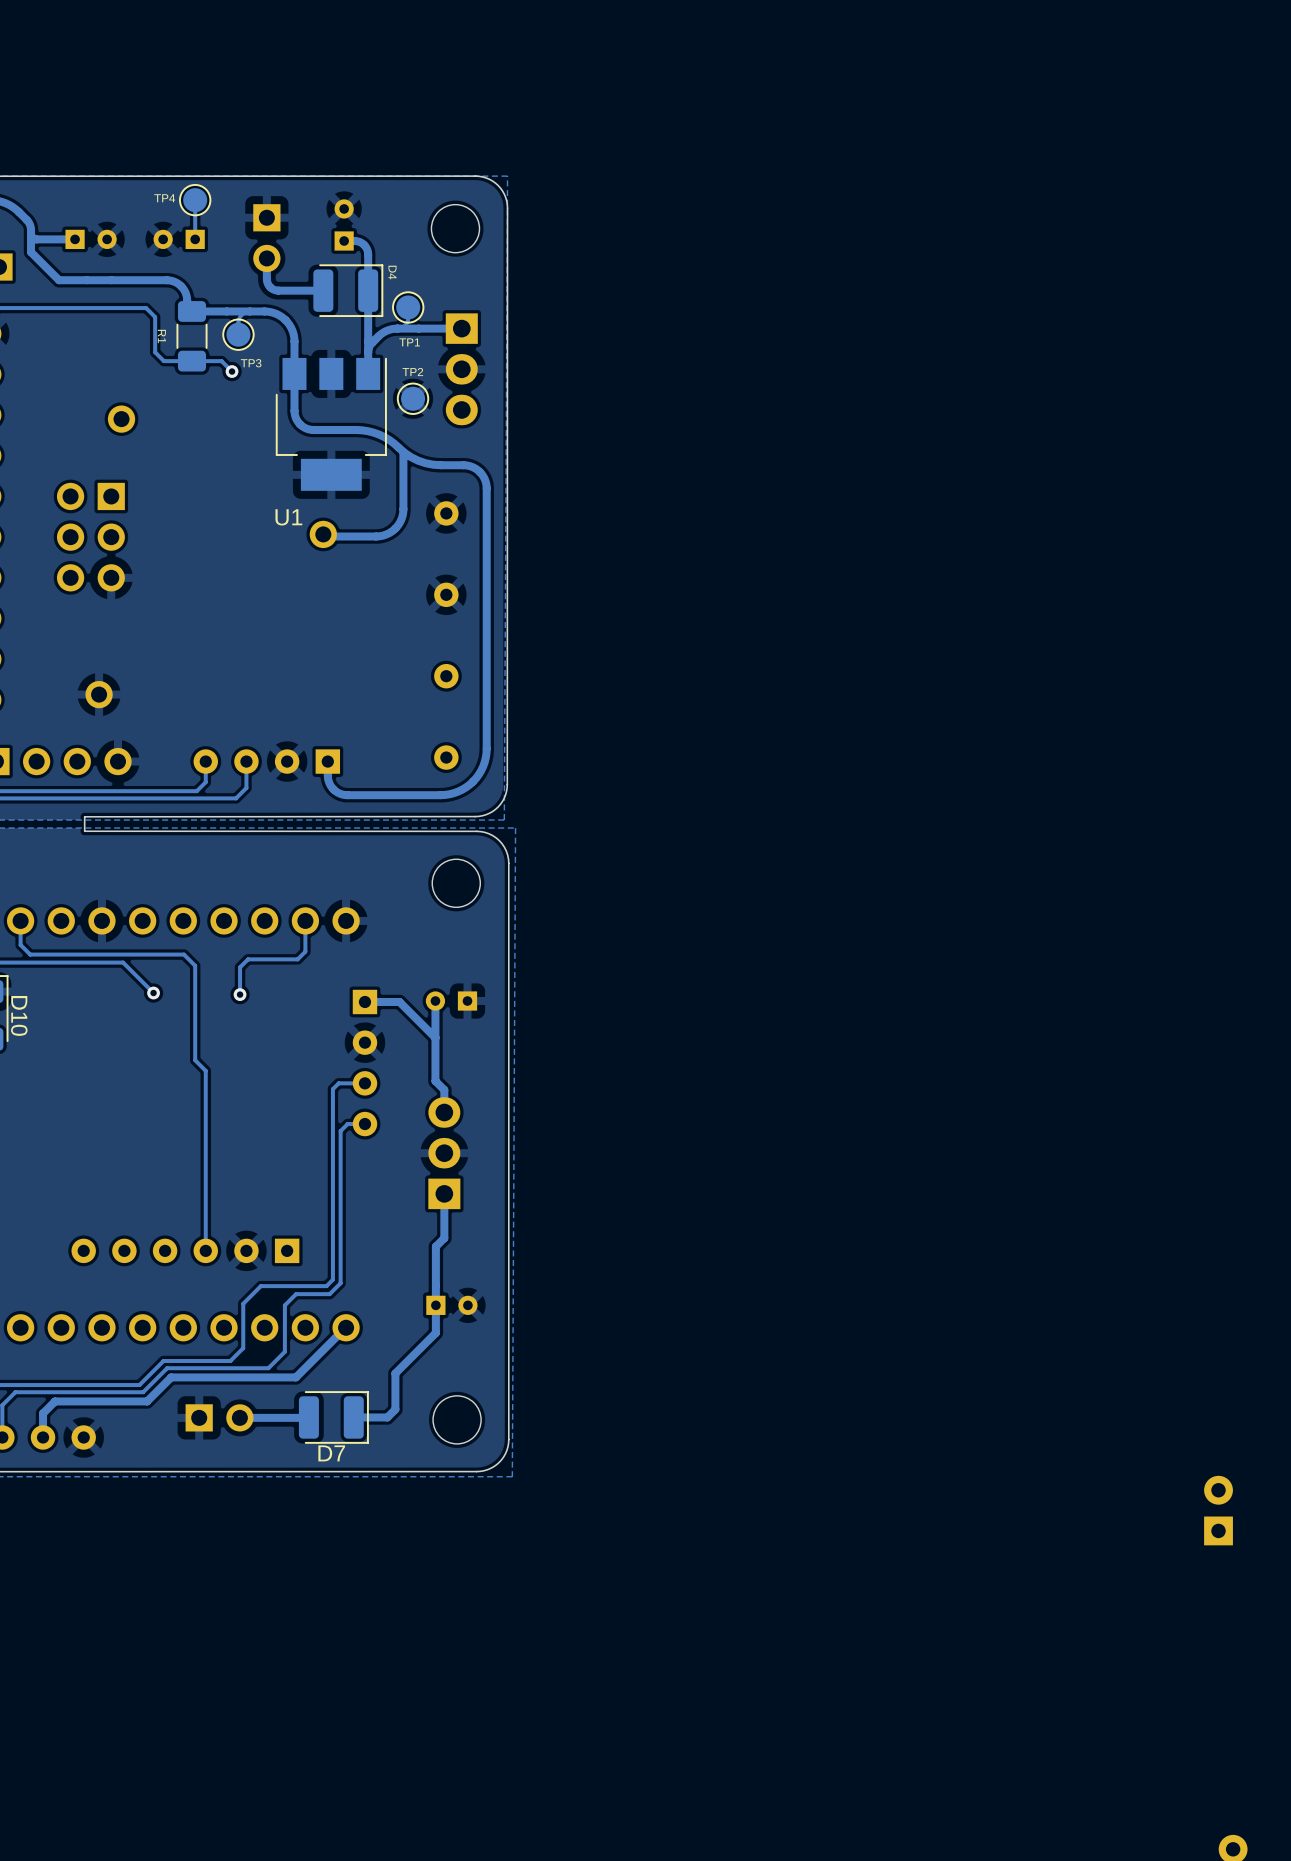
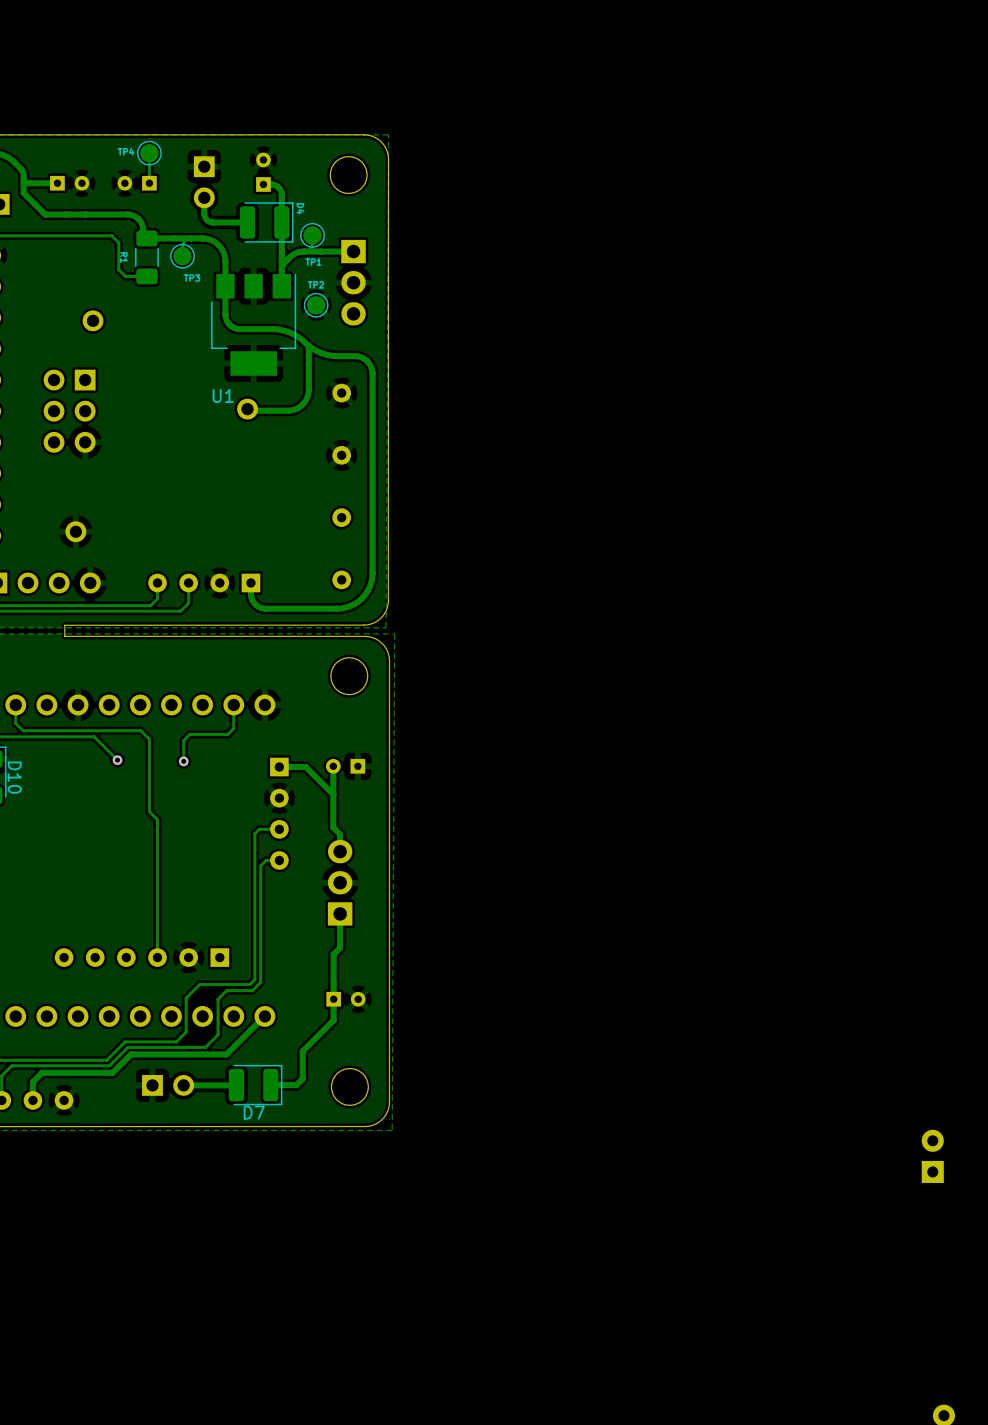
track: (191, 361) (221, 361) (232, 371) -> none
via: (232, 371) -> none

